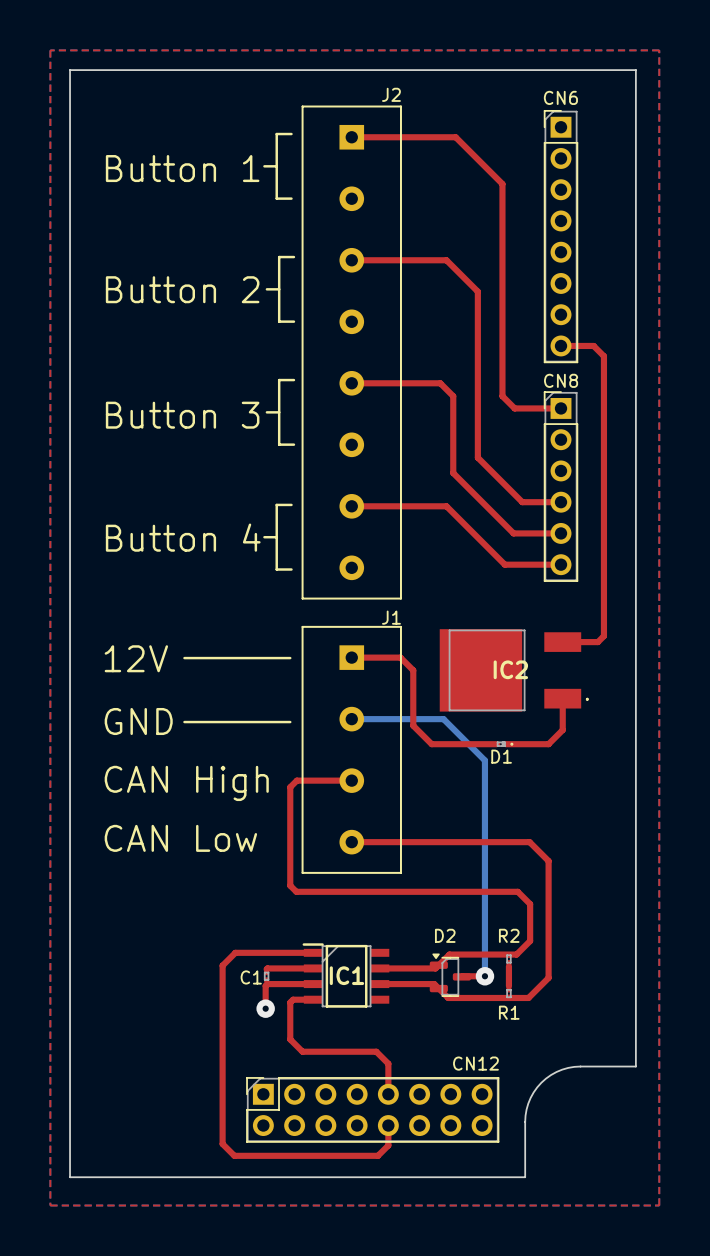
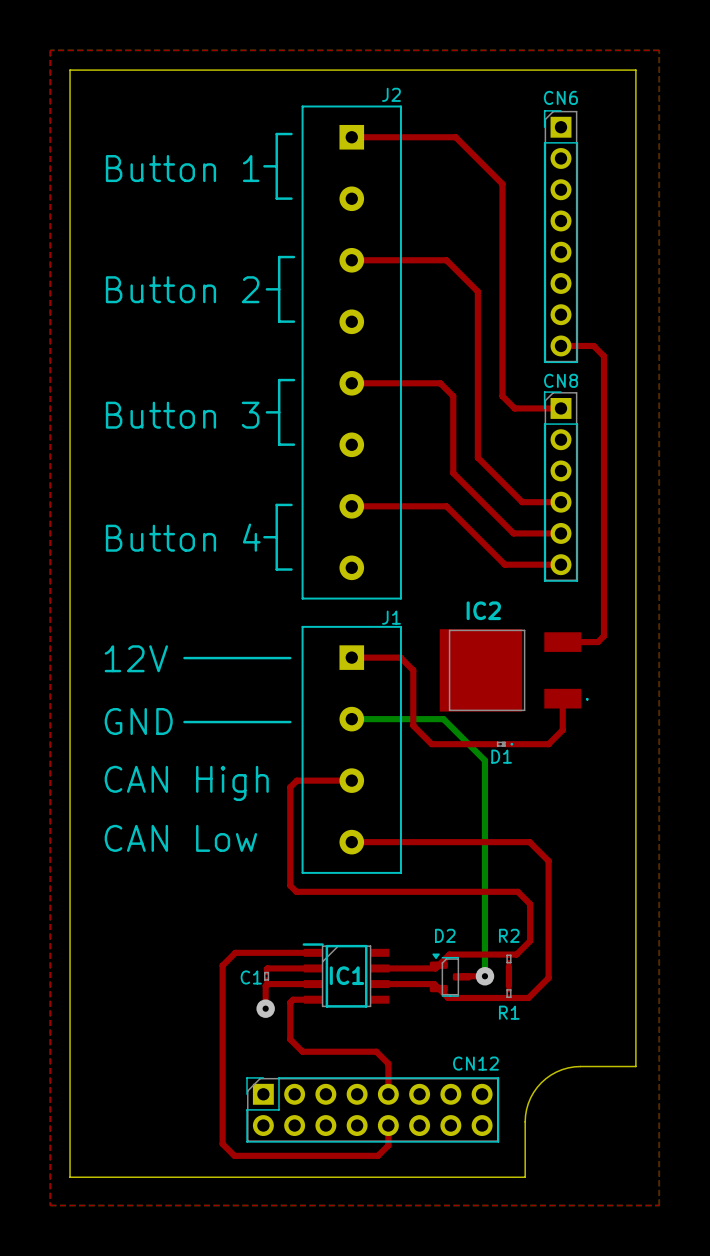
IC2 name position: IC2 (510, 669) -> IC2 (483, 610)

